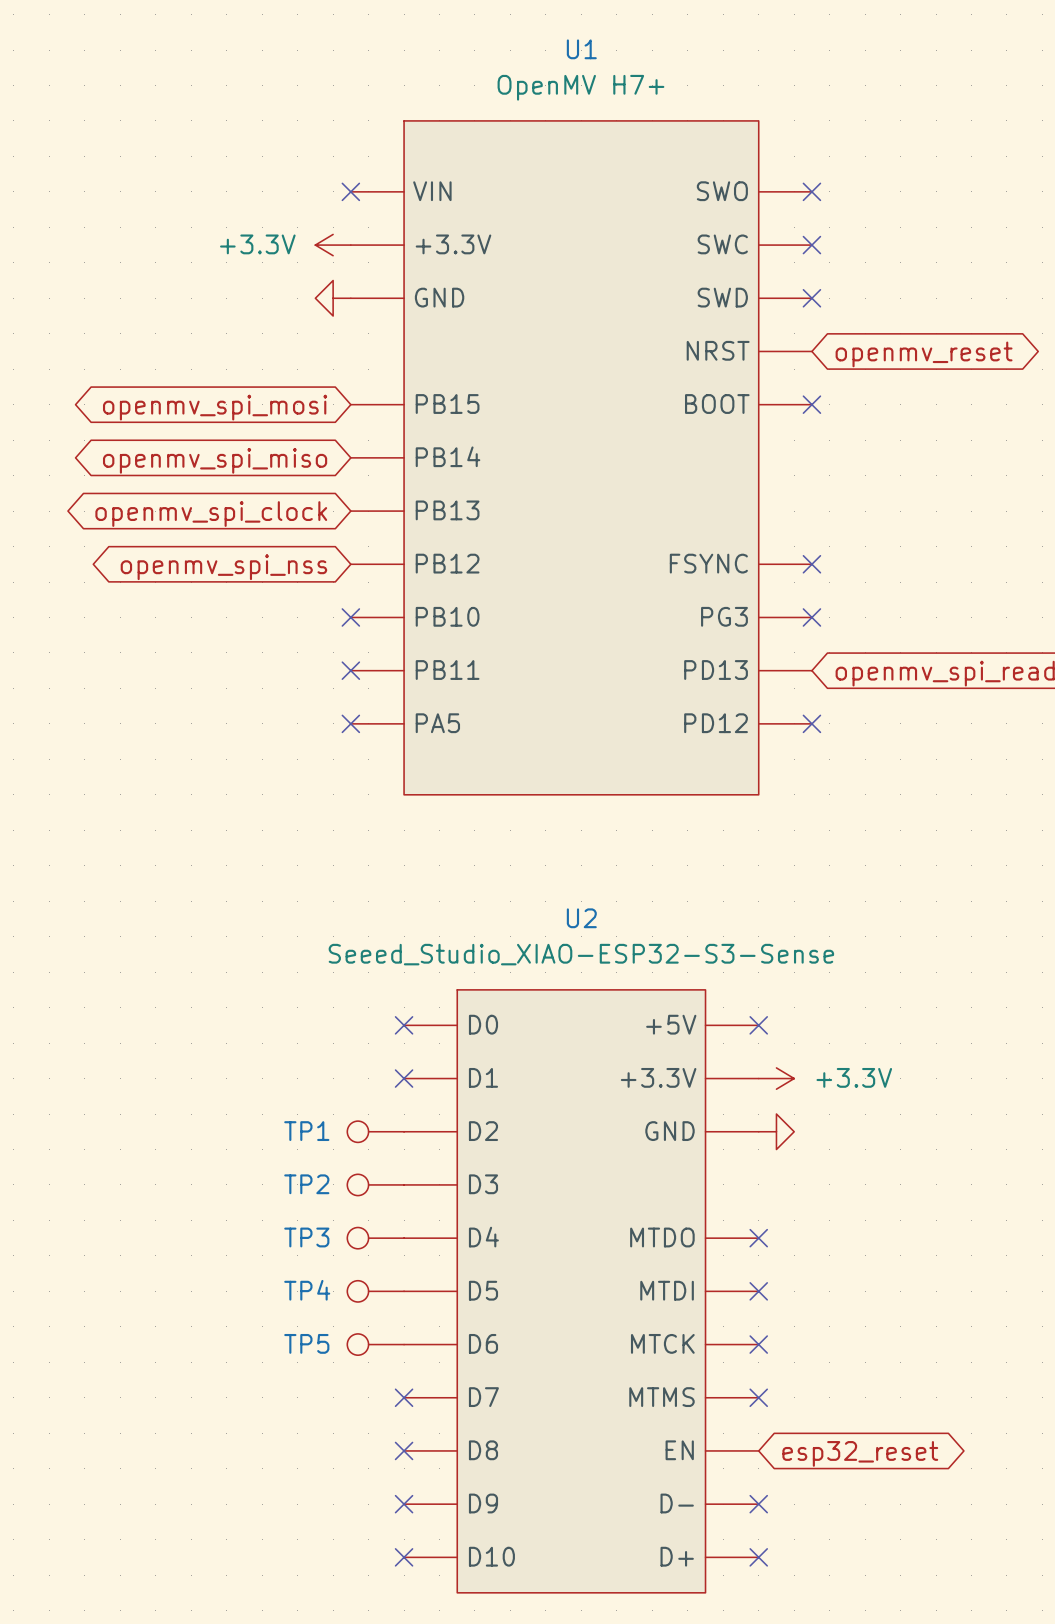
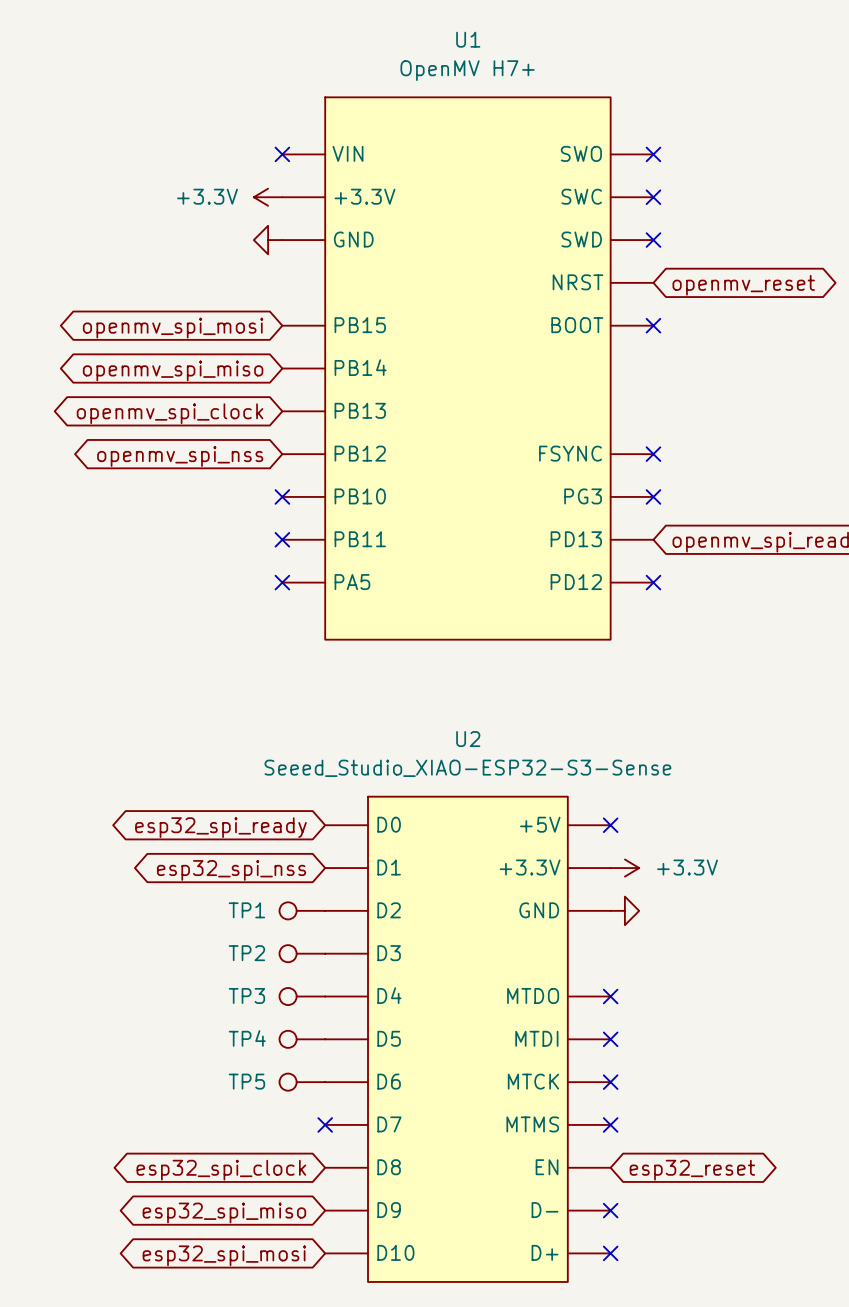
no-connect mark: (404, 1025) -> none
global label: none -> esp32_spi_ready (221, 827)
no-connect mark: (404, 1078) -> none
global label: none -> esp32_spi_nss (231, 870)
no-connect mark: (404, 1450) -> none
global label: none -> esp32_spi_clock (221, 1170)
no-connect mark: (404, 1504) -> none
global label: none -> esp32_spi_miso (224, 1212)
no-connect mark: (404, 1557) -> none
global label: none -> esp32_spi_mosi (224, 1255)

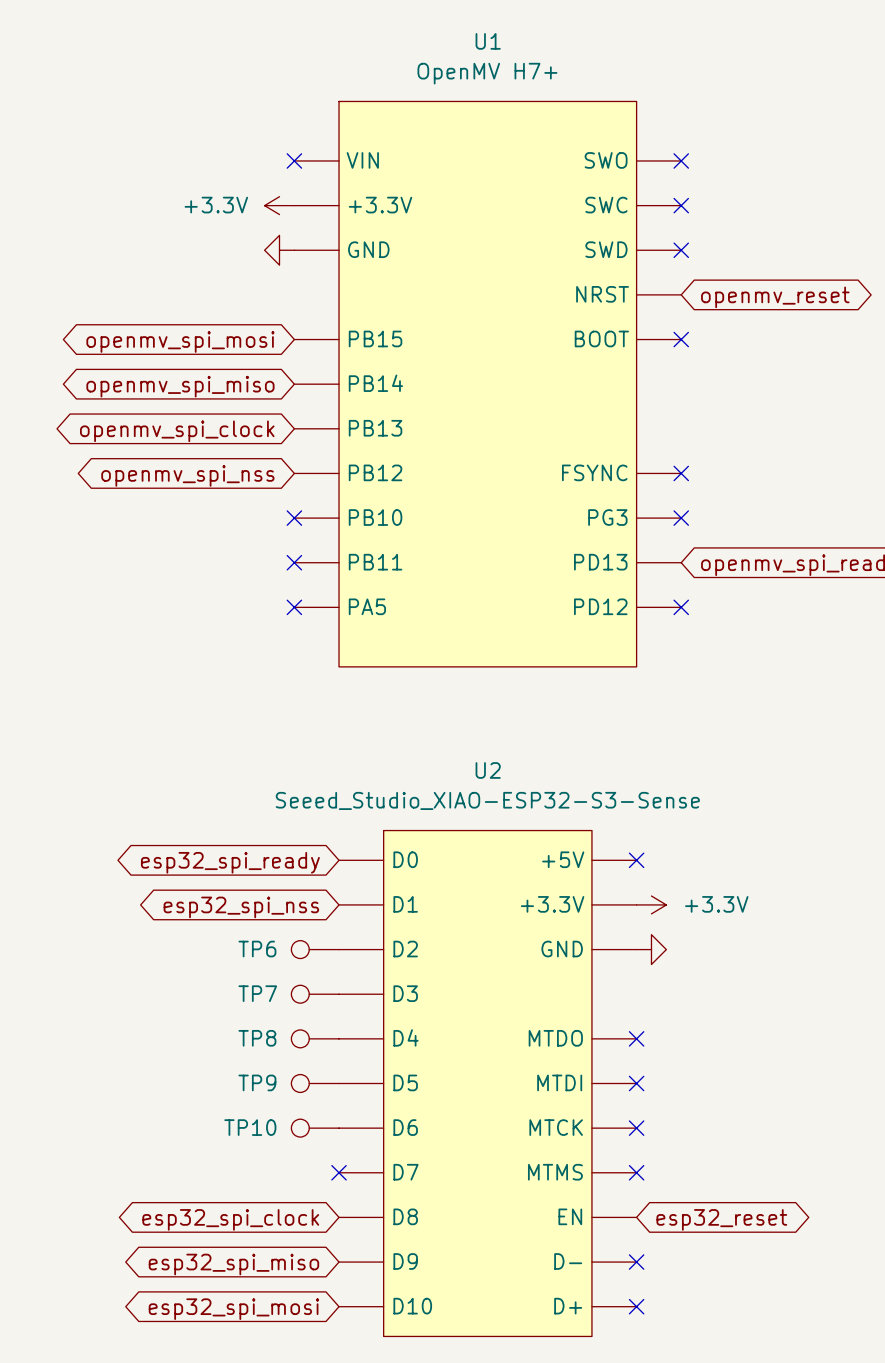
TP1 name: TP1 (246, 910) -> TP6 (257, 949)
TP2 name: TP2 (246, 953) -> TP7 (257, 993)
TP3 name: TP3 (246, 995) -> TP8 (257, 1038)
TP4 name: TP4 (247, 1038) -> TP9 (257, 1082)
TP5 name: TP5 (246, 1081) -> TP10 (250, 1127)

